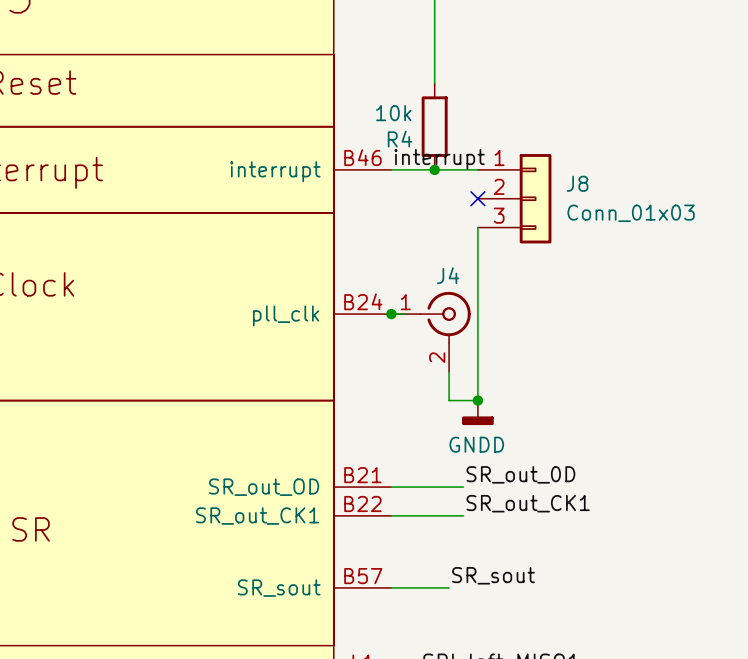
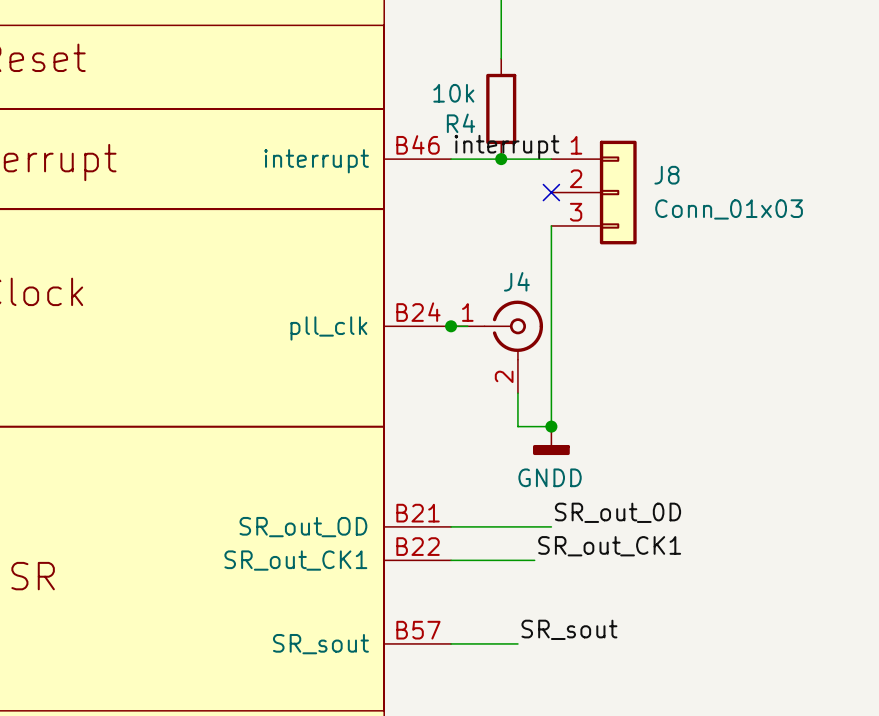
label position: SR_out_0D (520, 474) -> SR_out_0D (618, 512)
wire: none -> (534, 526) (551, 526)

